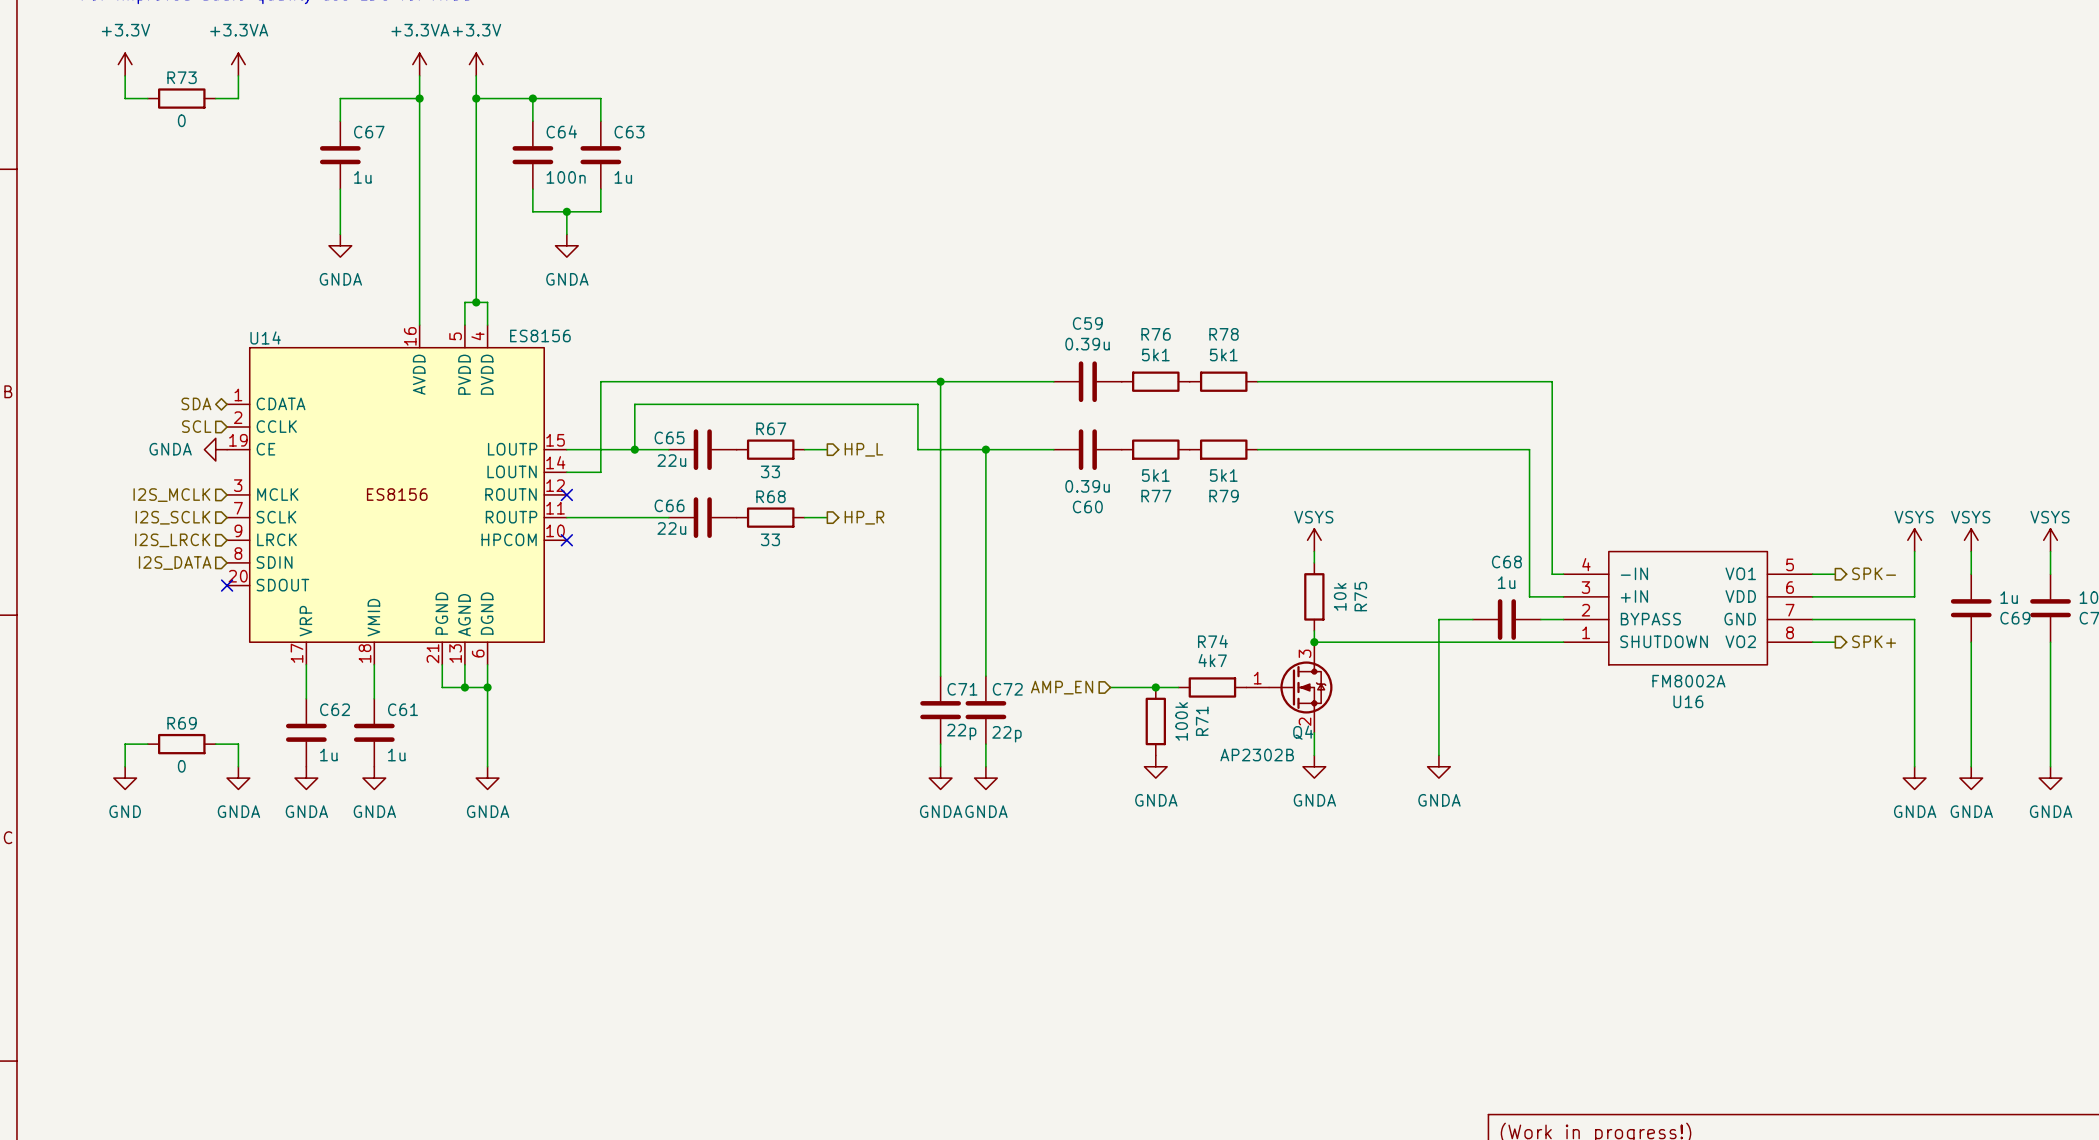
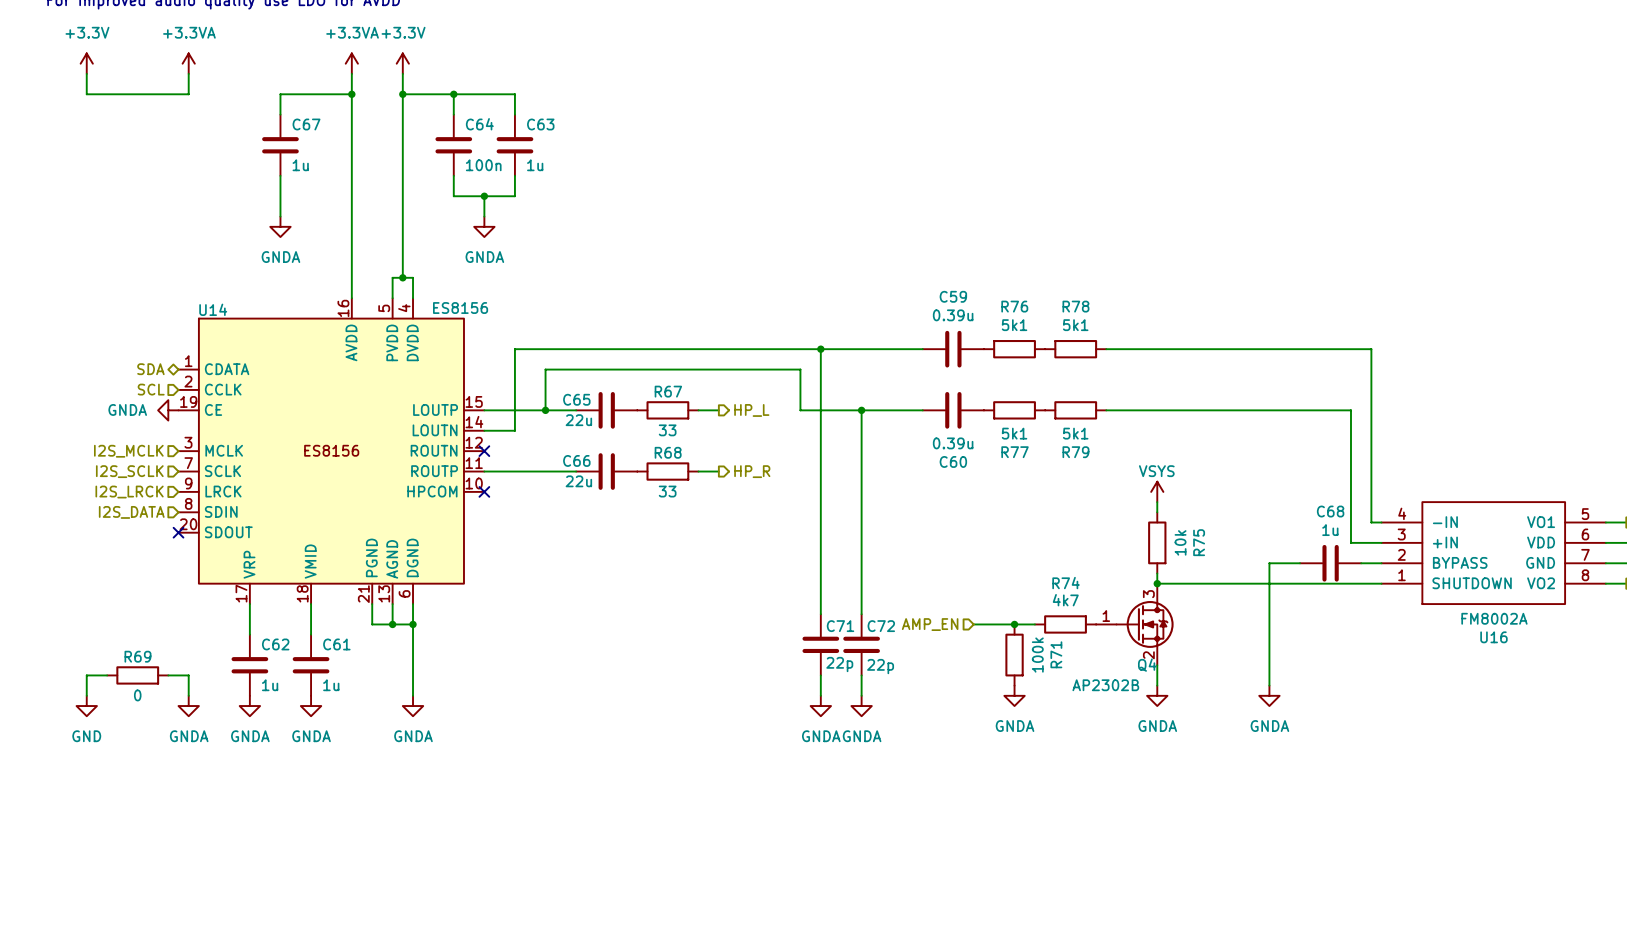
wire: none -> (107, 94) (168, 94)
R73: 0 (181, 98) -> none

